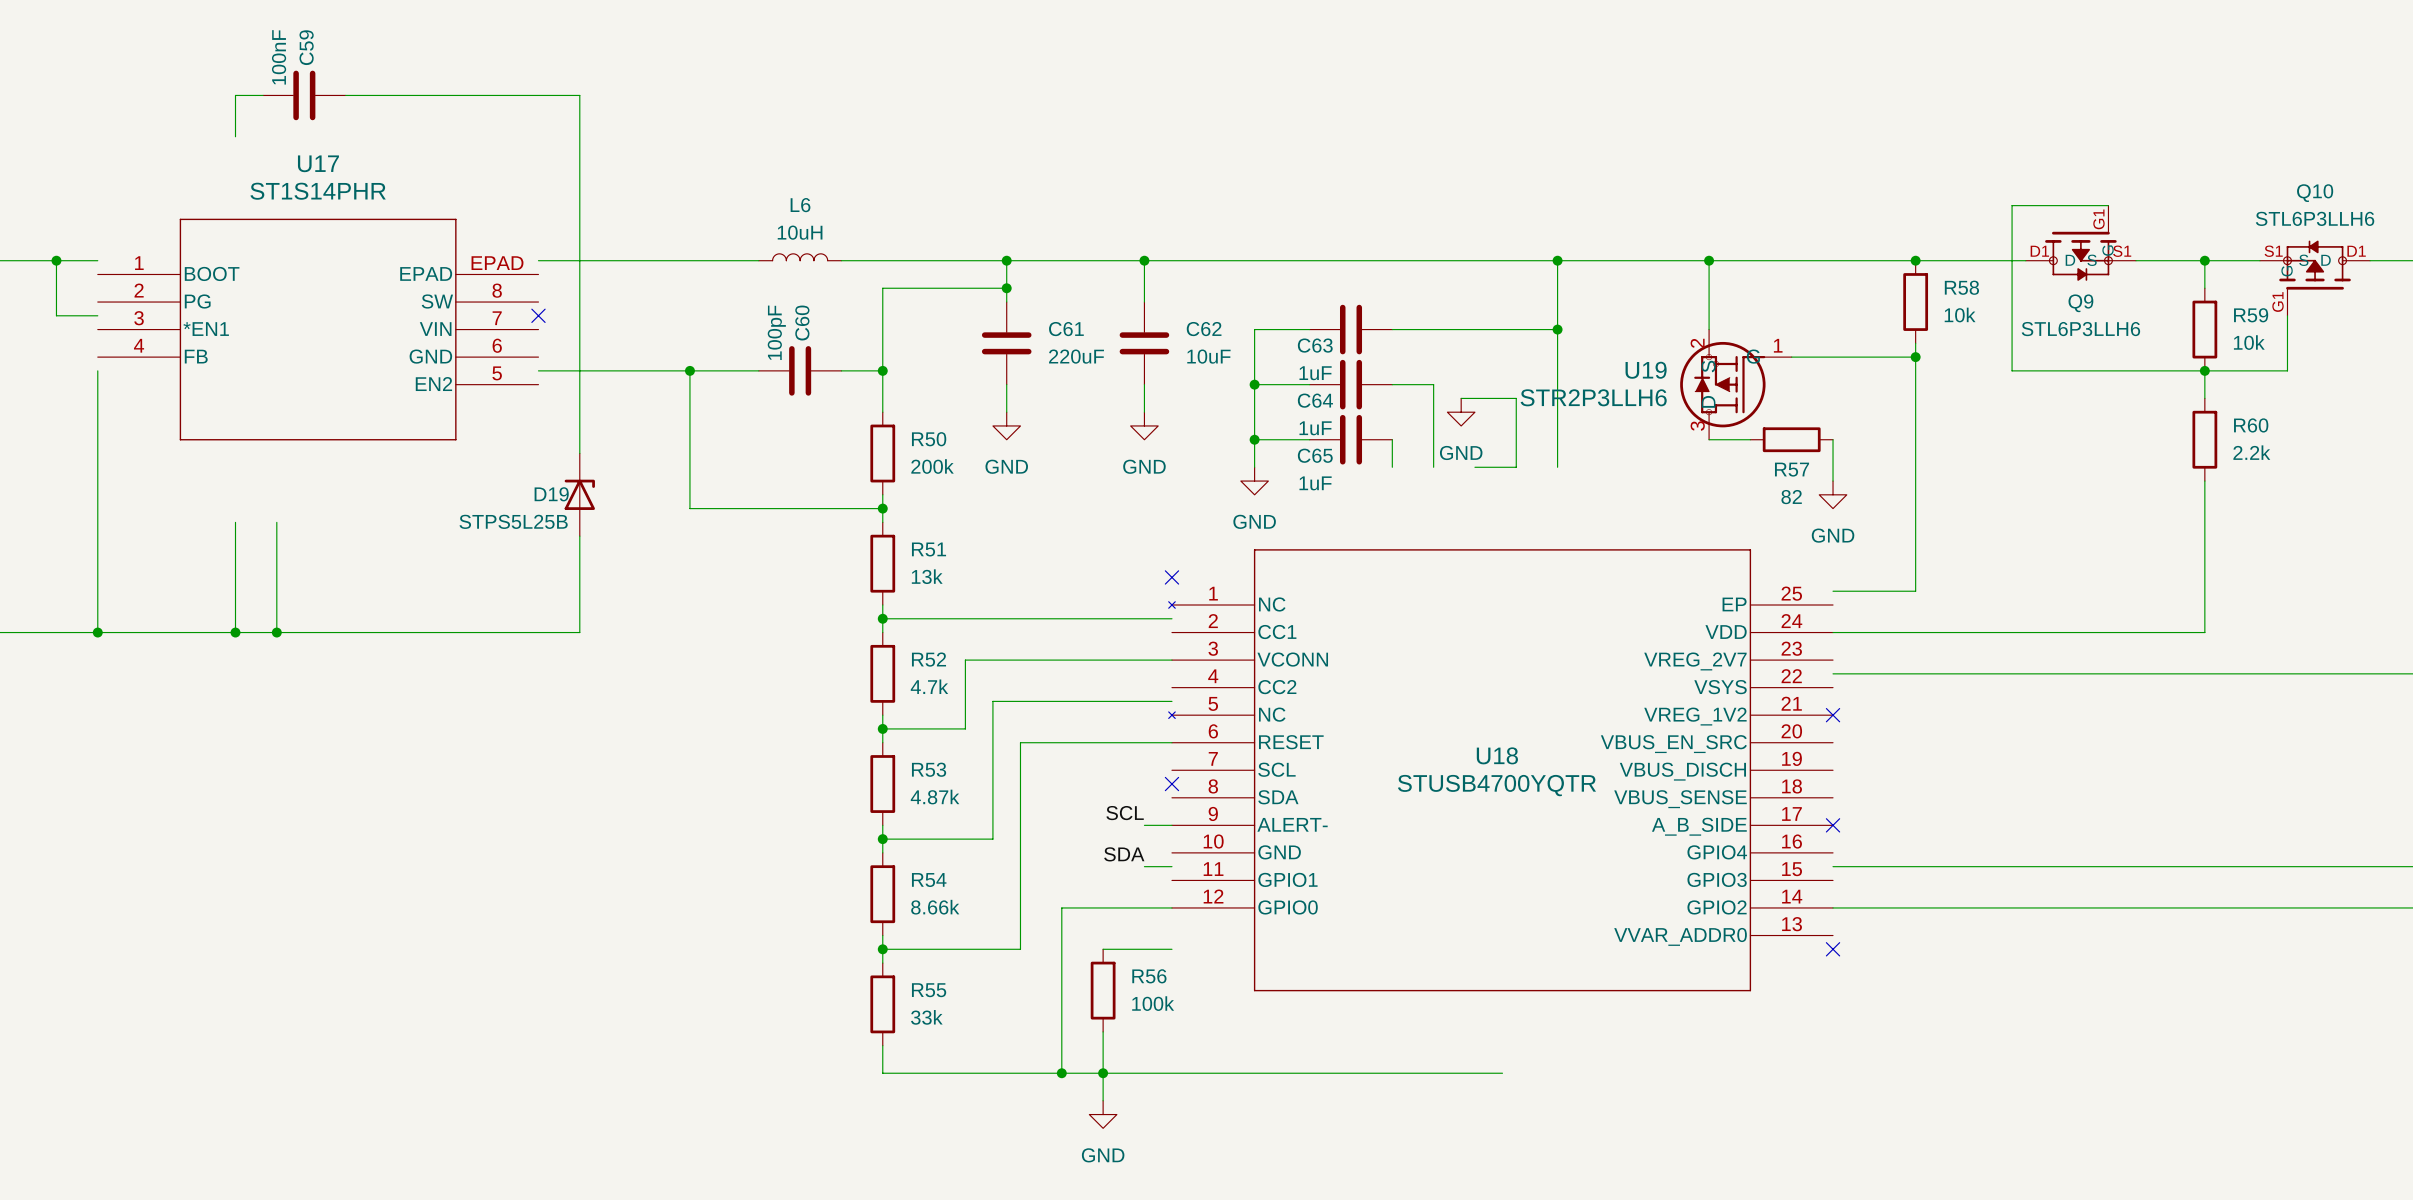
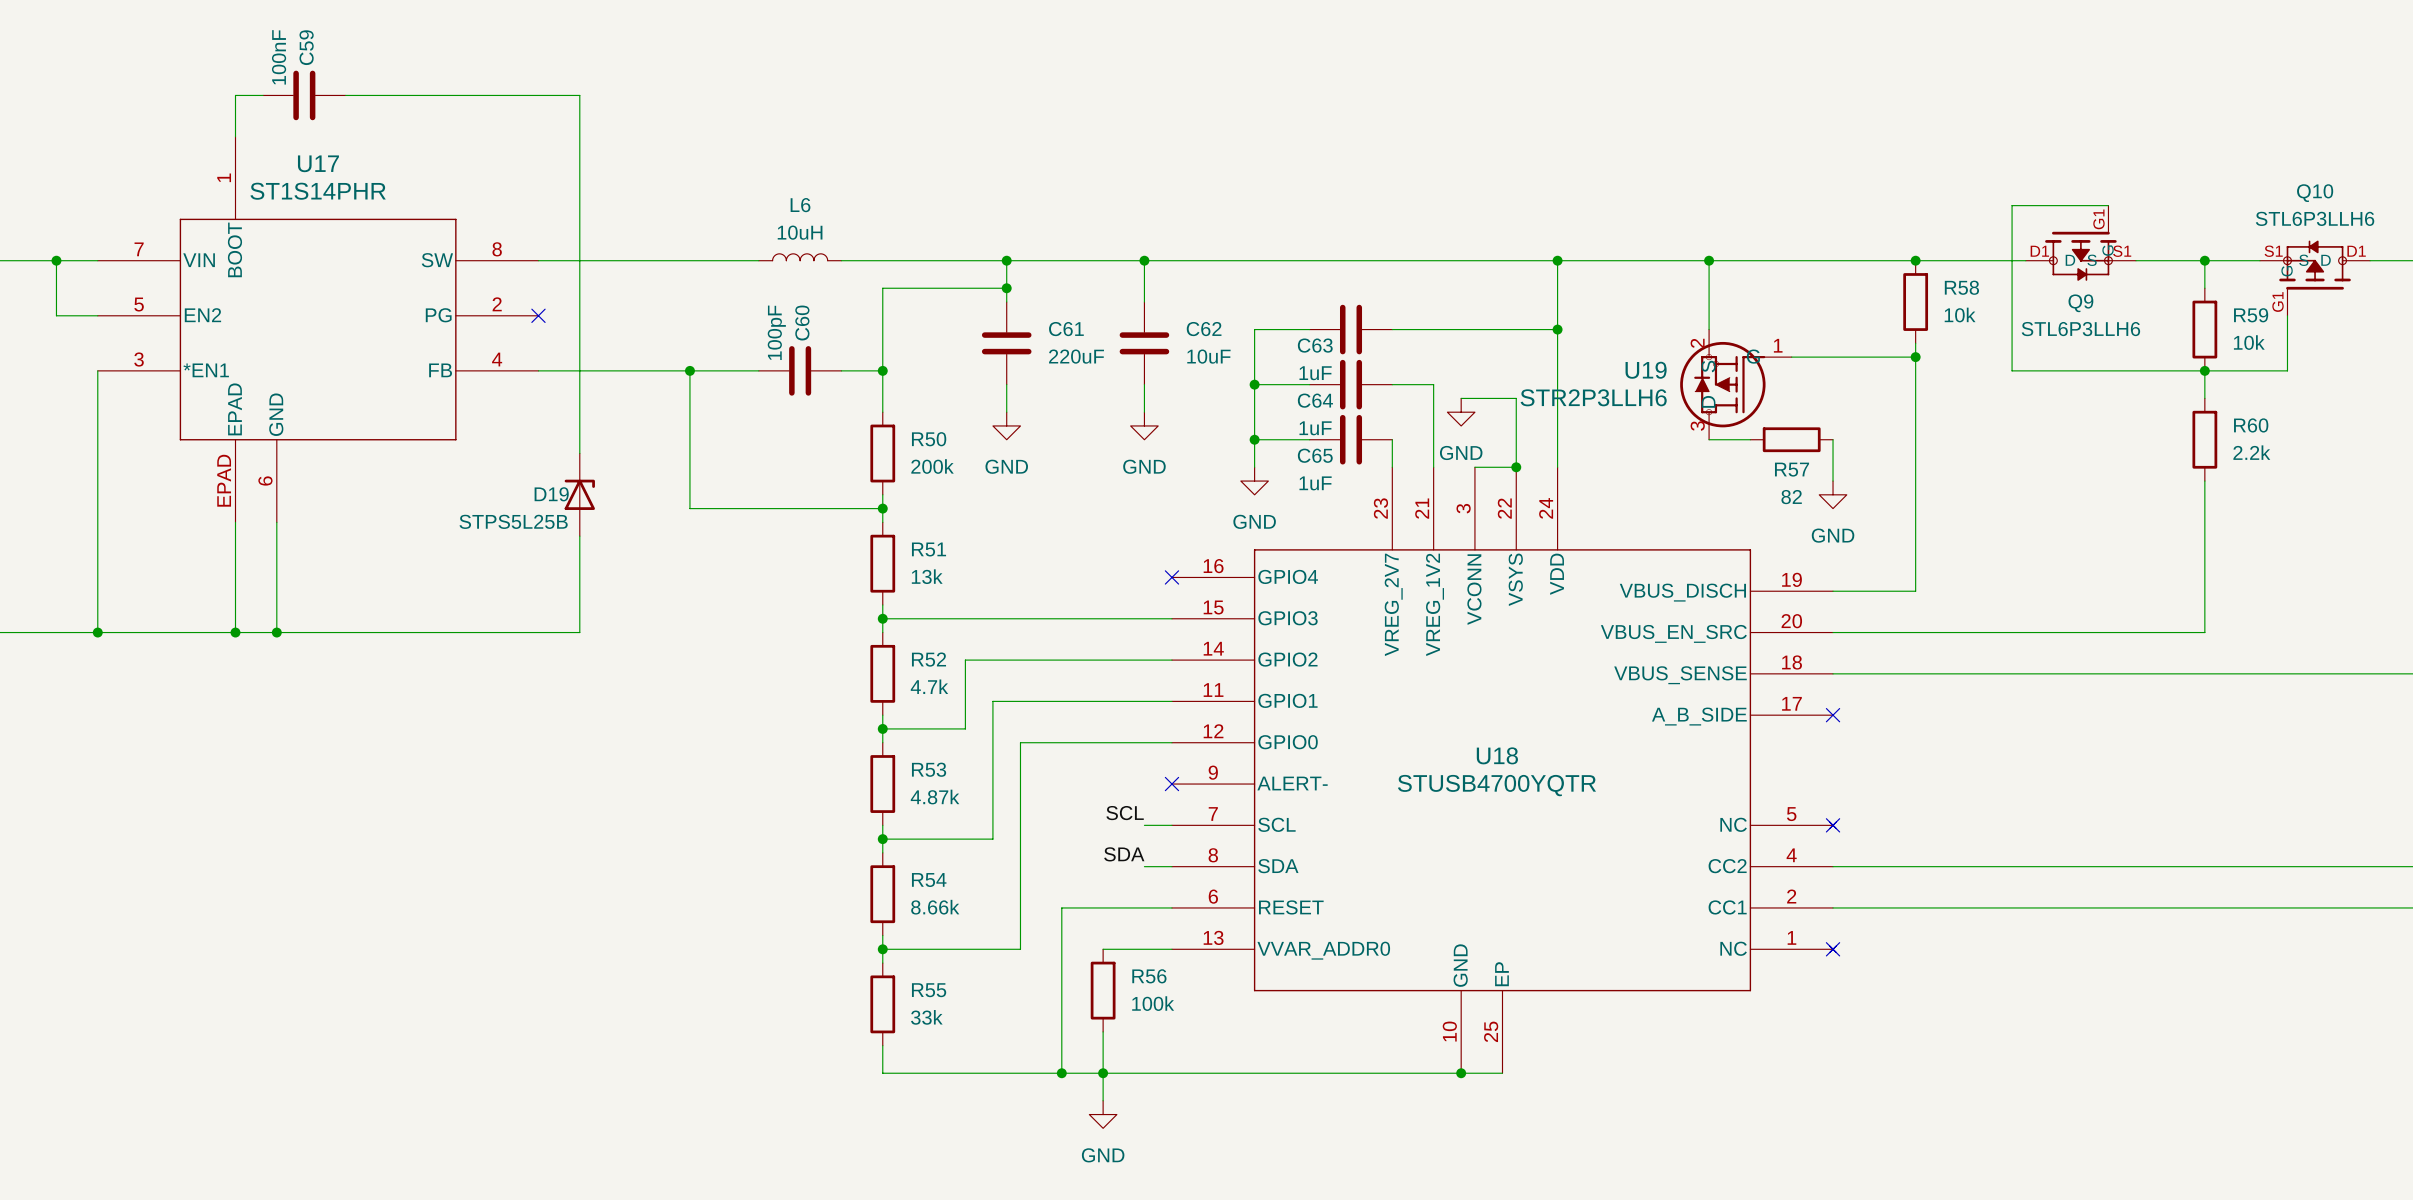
U17 symbol: [97, 218, 539, 441] -> [97, 136, 539, 523]
junction: none -> (1516, 467)
U18 symbol: [1168, 549, 1834, 992] -> [1171, 467, 1837, 1074]
junction: none -> (1461, 1073)

